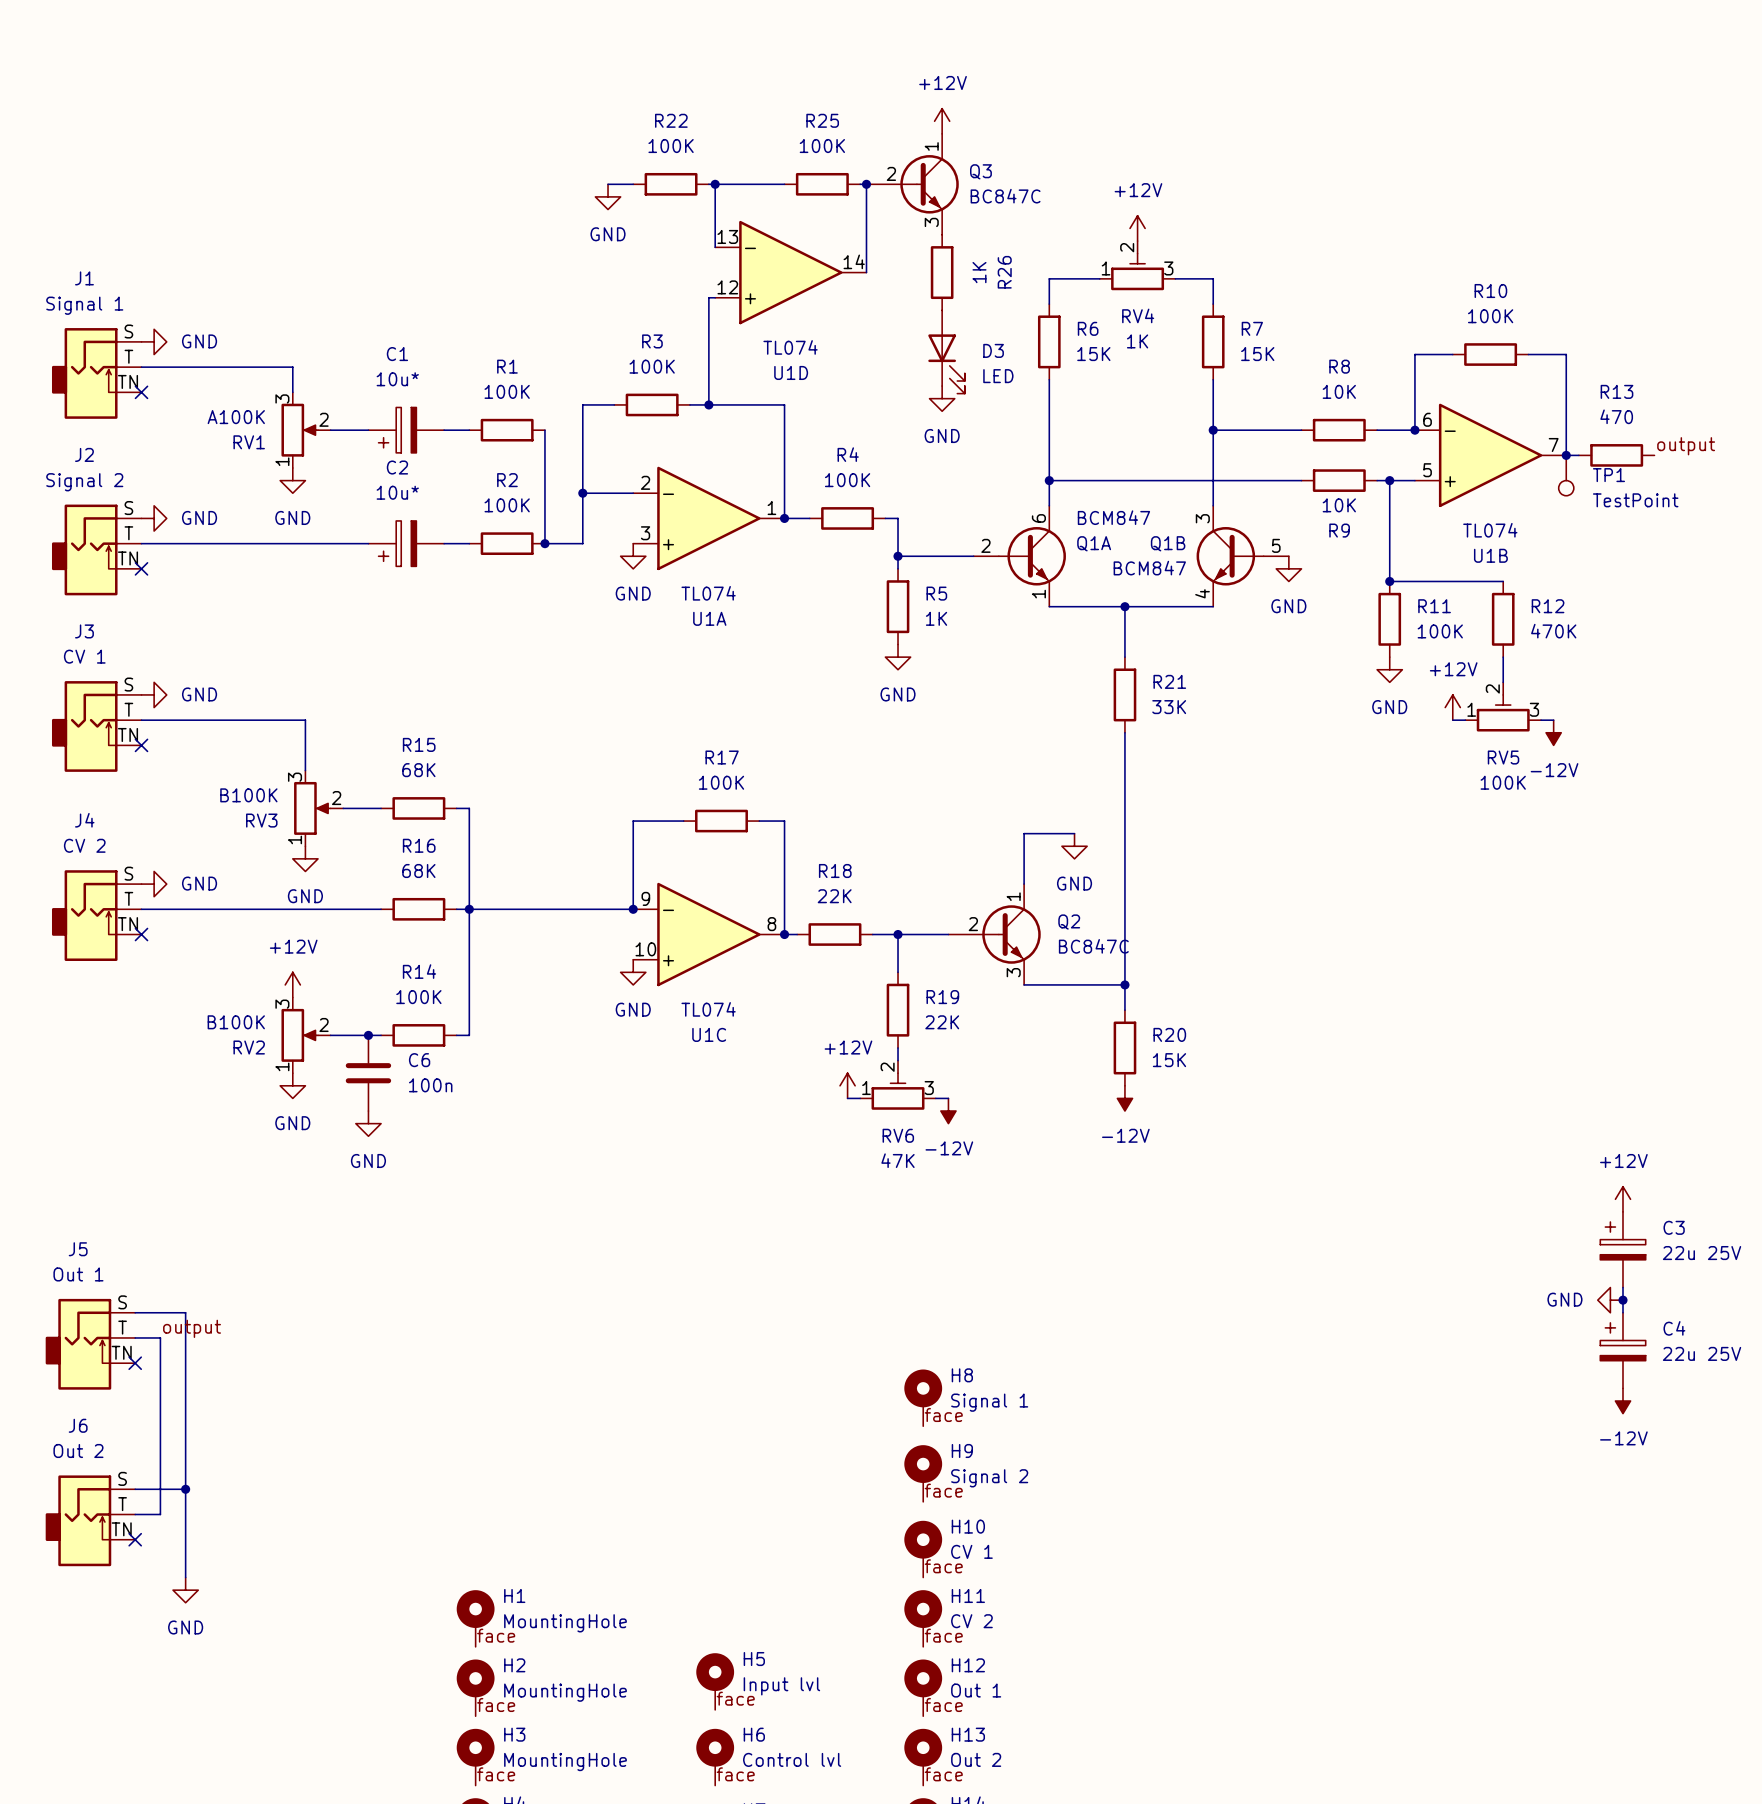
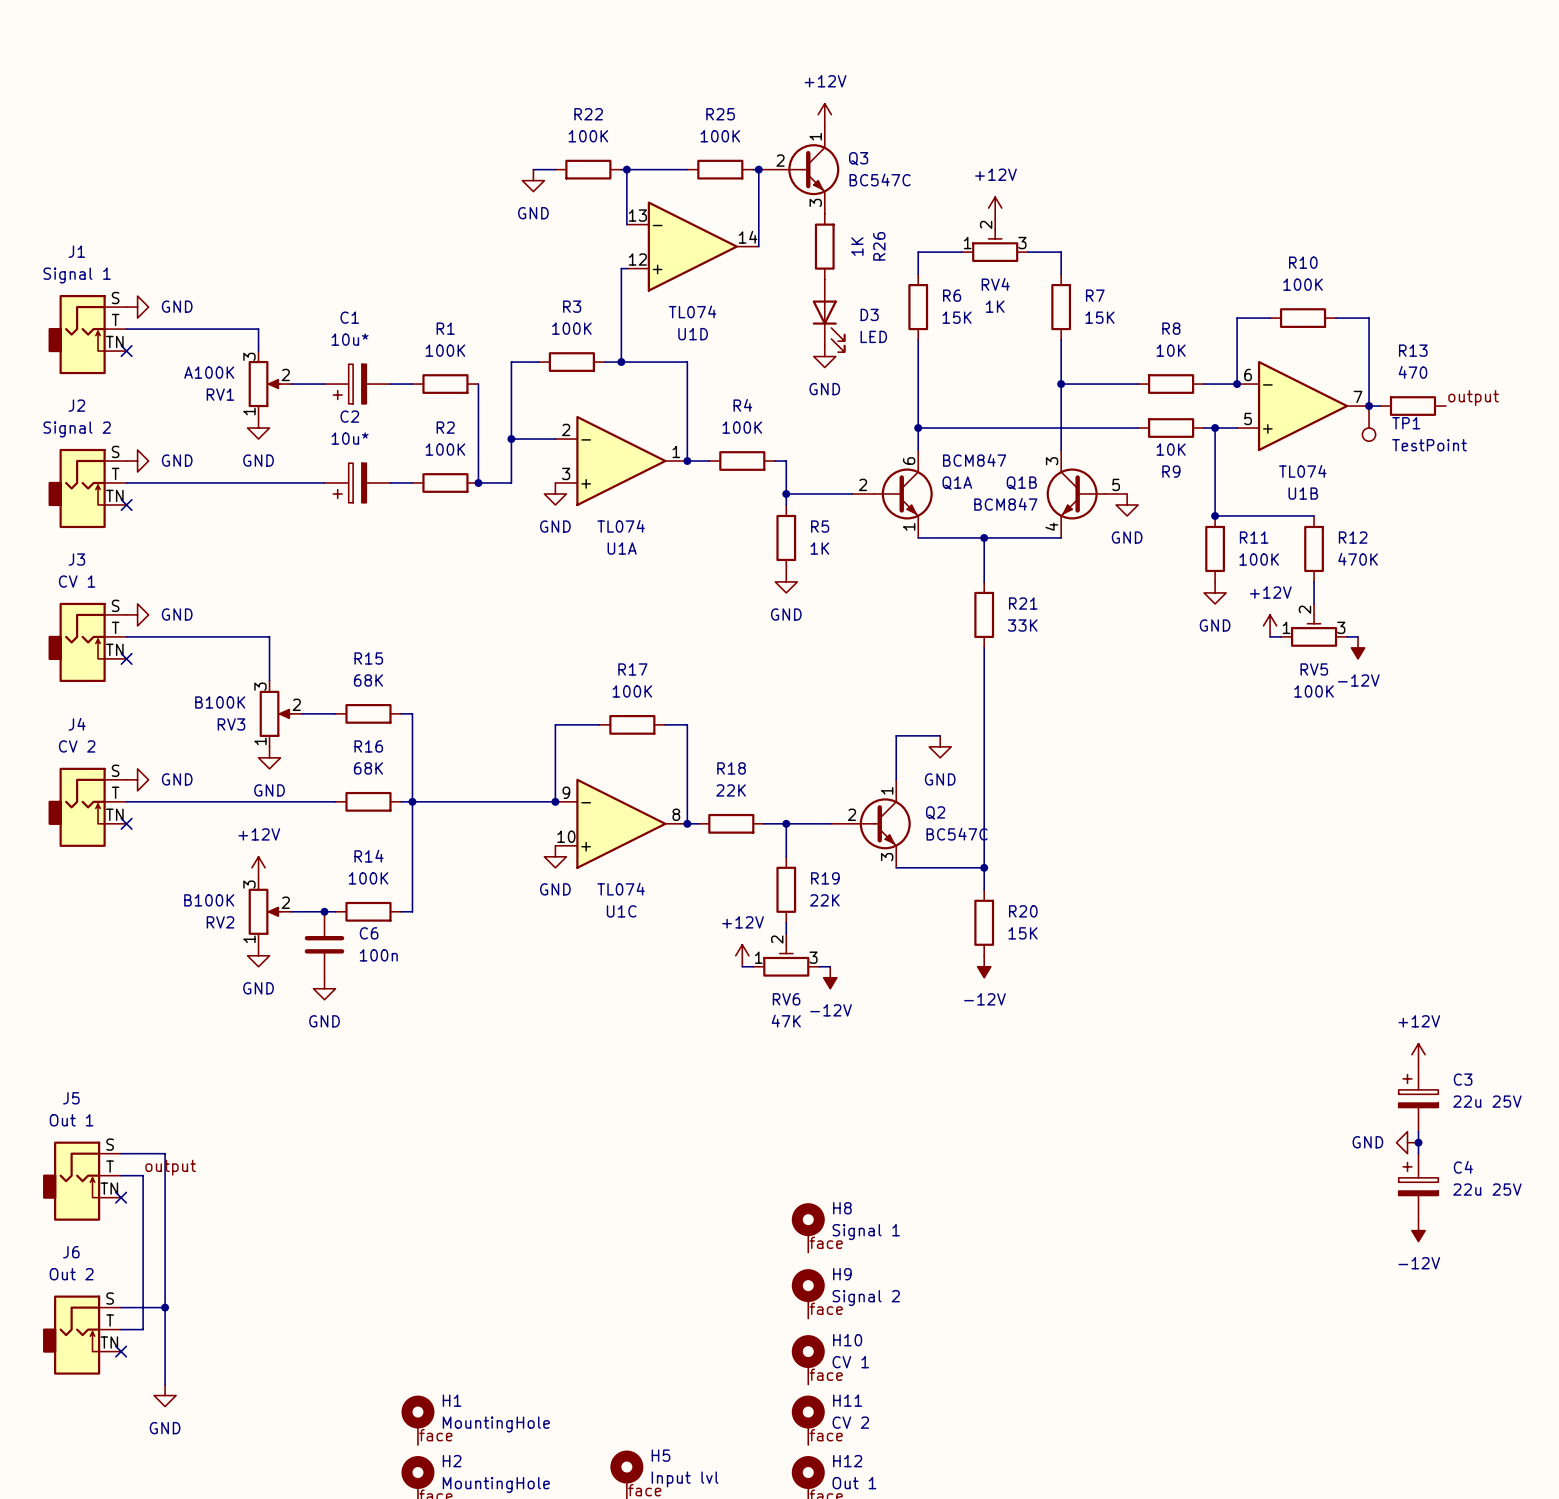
Q3 value: BC847C (1005, 196) -> BC547C (880, 179)
Q2 value: BC847C (1093, 946) -> BC547C (957, 834)

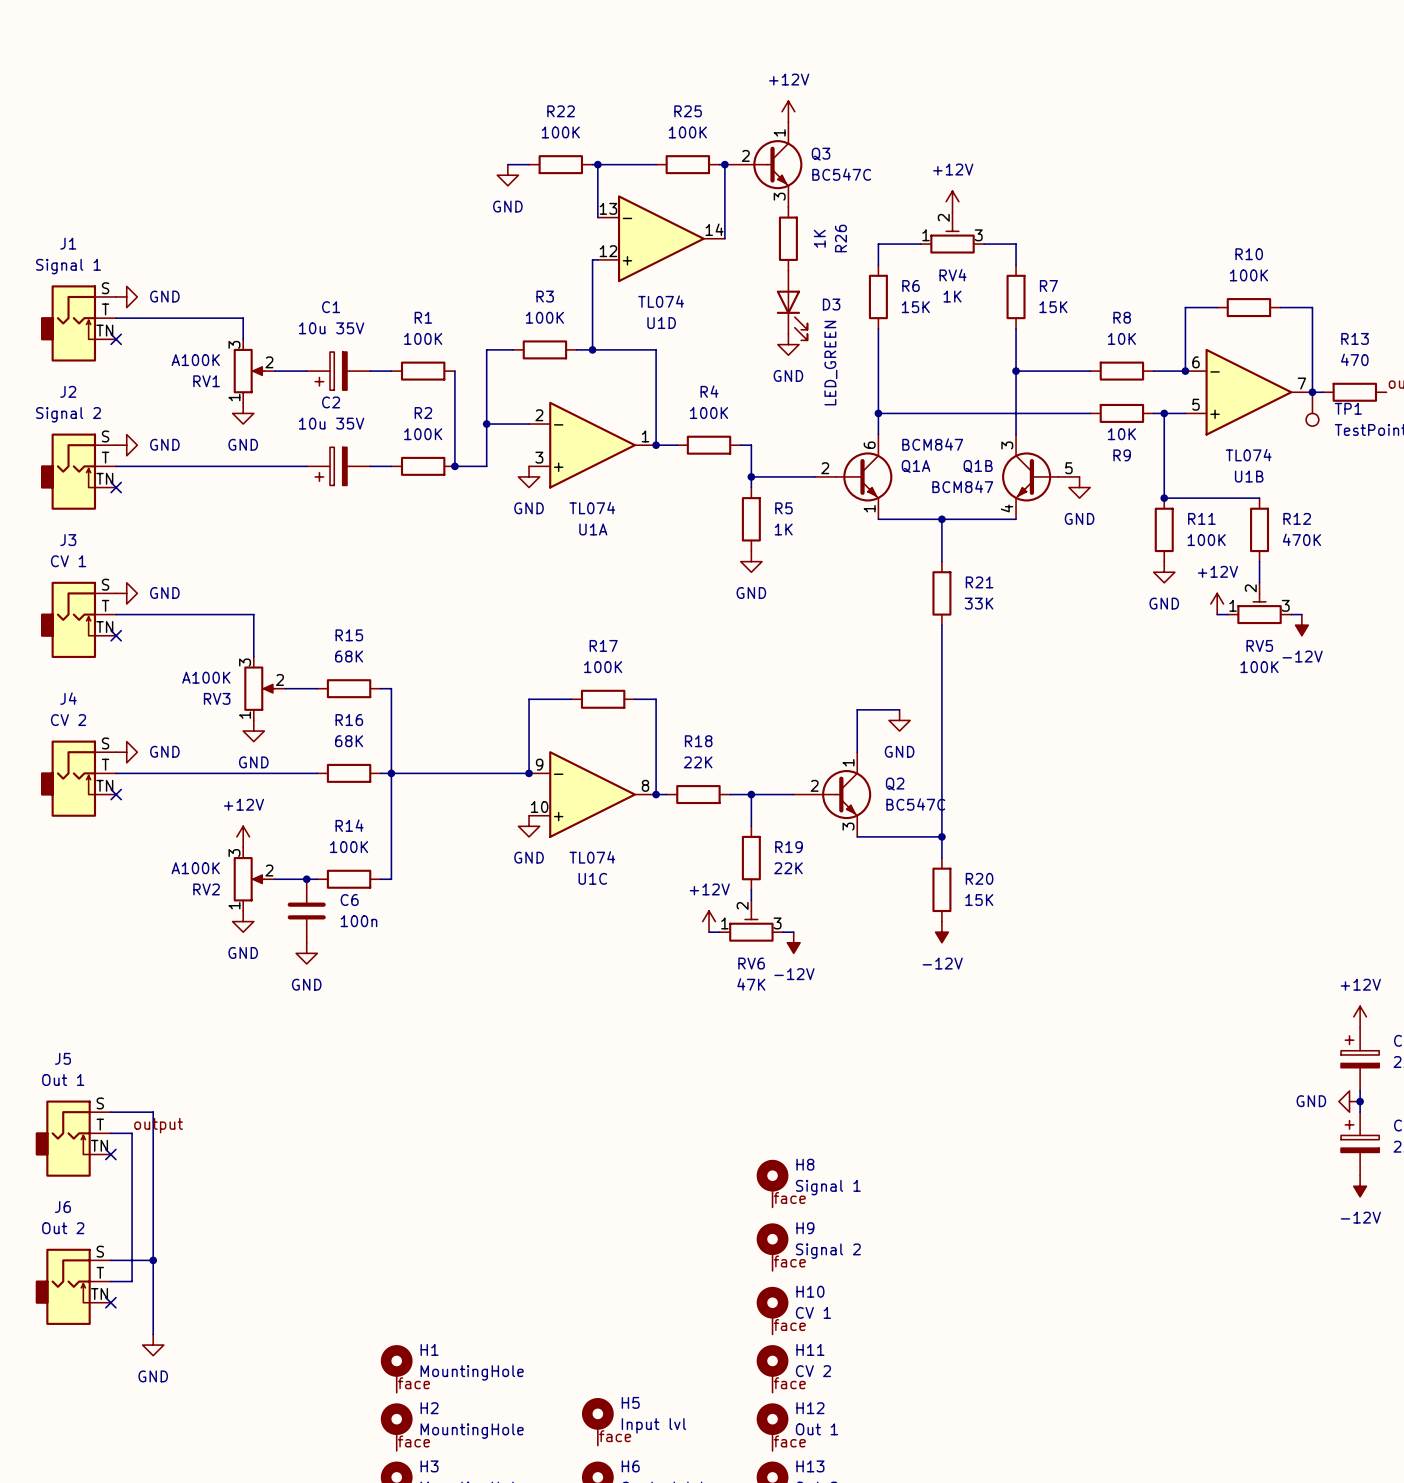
D3 value: LED (873, 336) -> LED_GREEN (830, 363)
C1 value: 10u* (350, 339) -> 10u 35V (331, 328)
C2 value: 10u* (350, 438) -> 10u 35V (331, 423)
RV3 value: B100K (220, 702) -> A100K (206, 677)
RV2 value: B100K (209, 900) -> A100K (195, 868)

